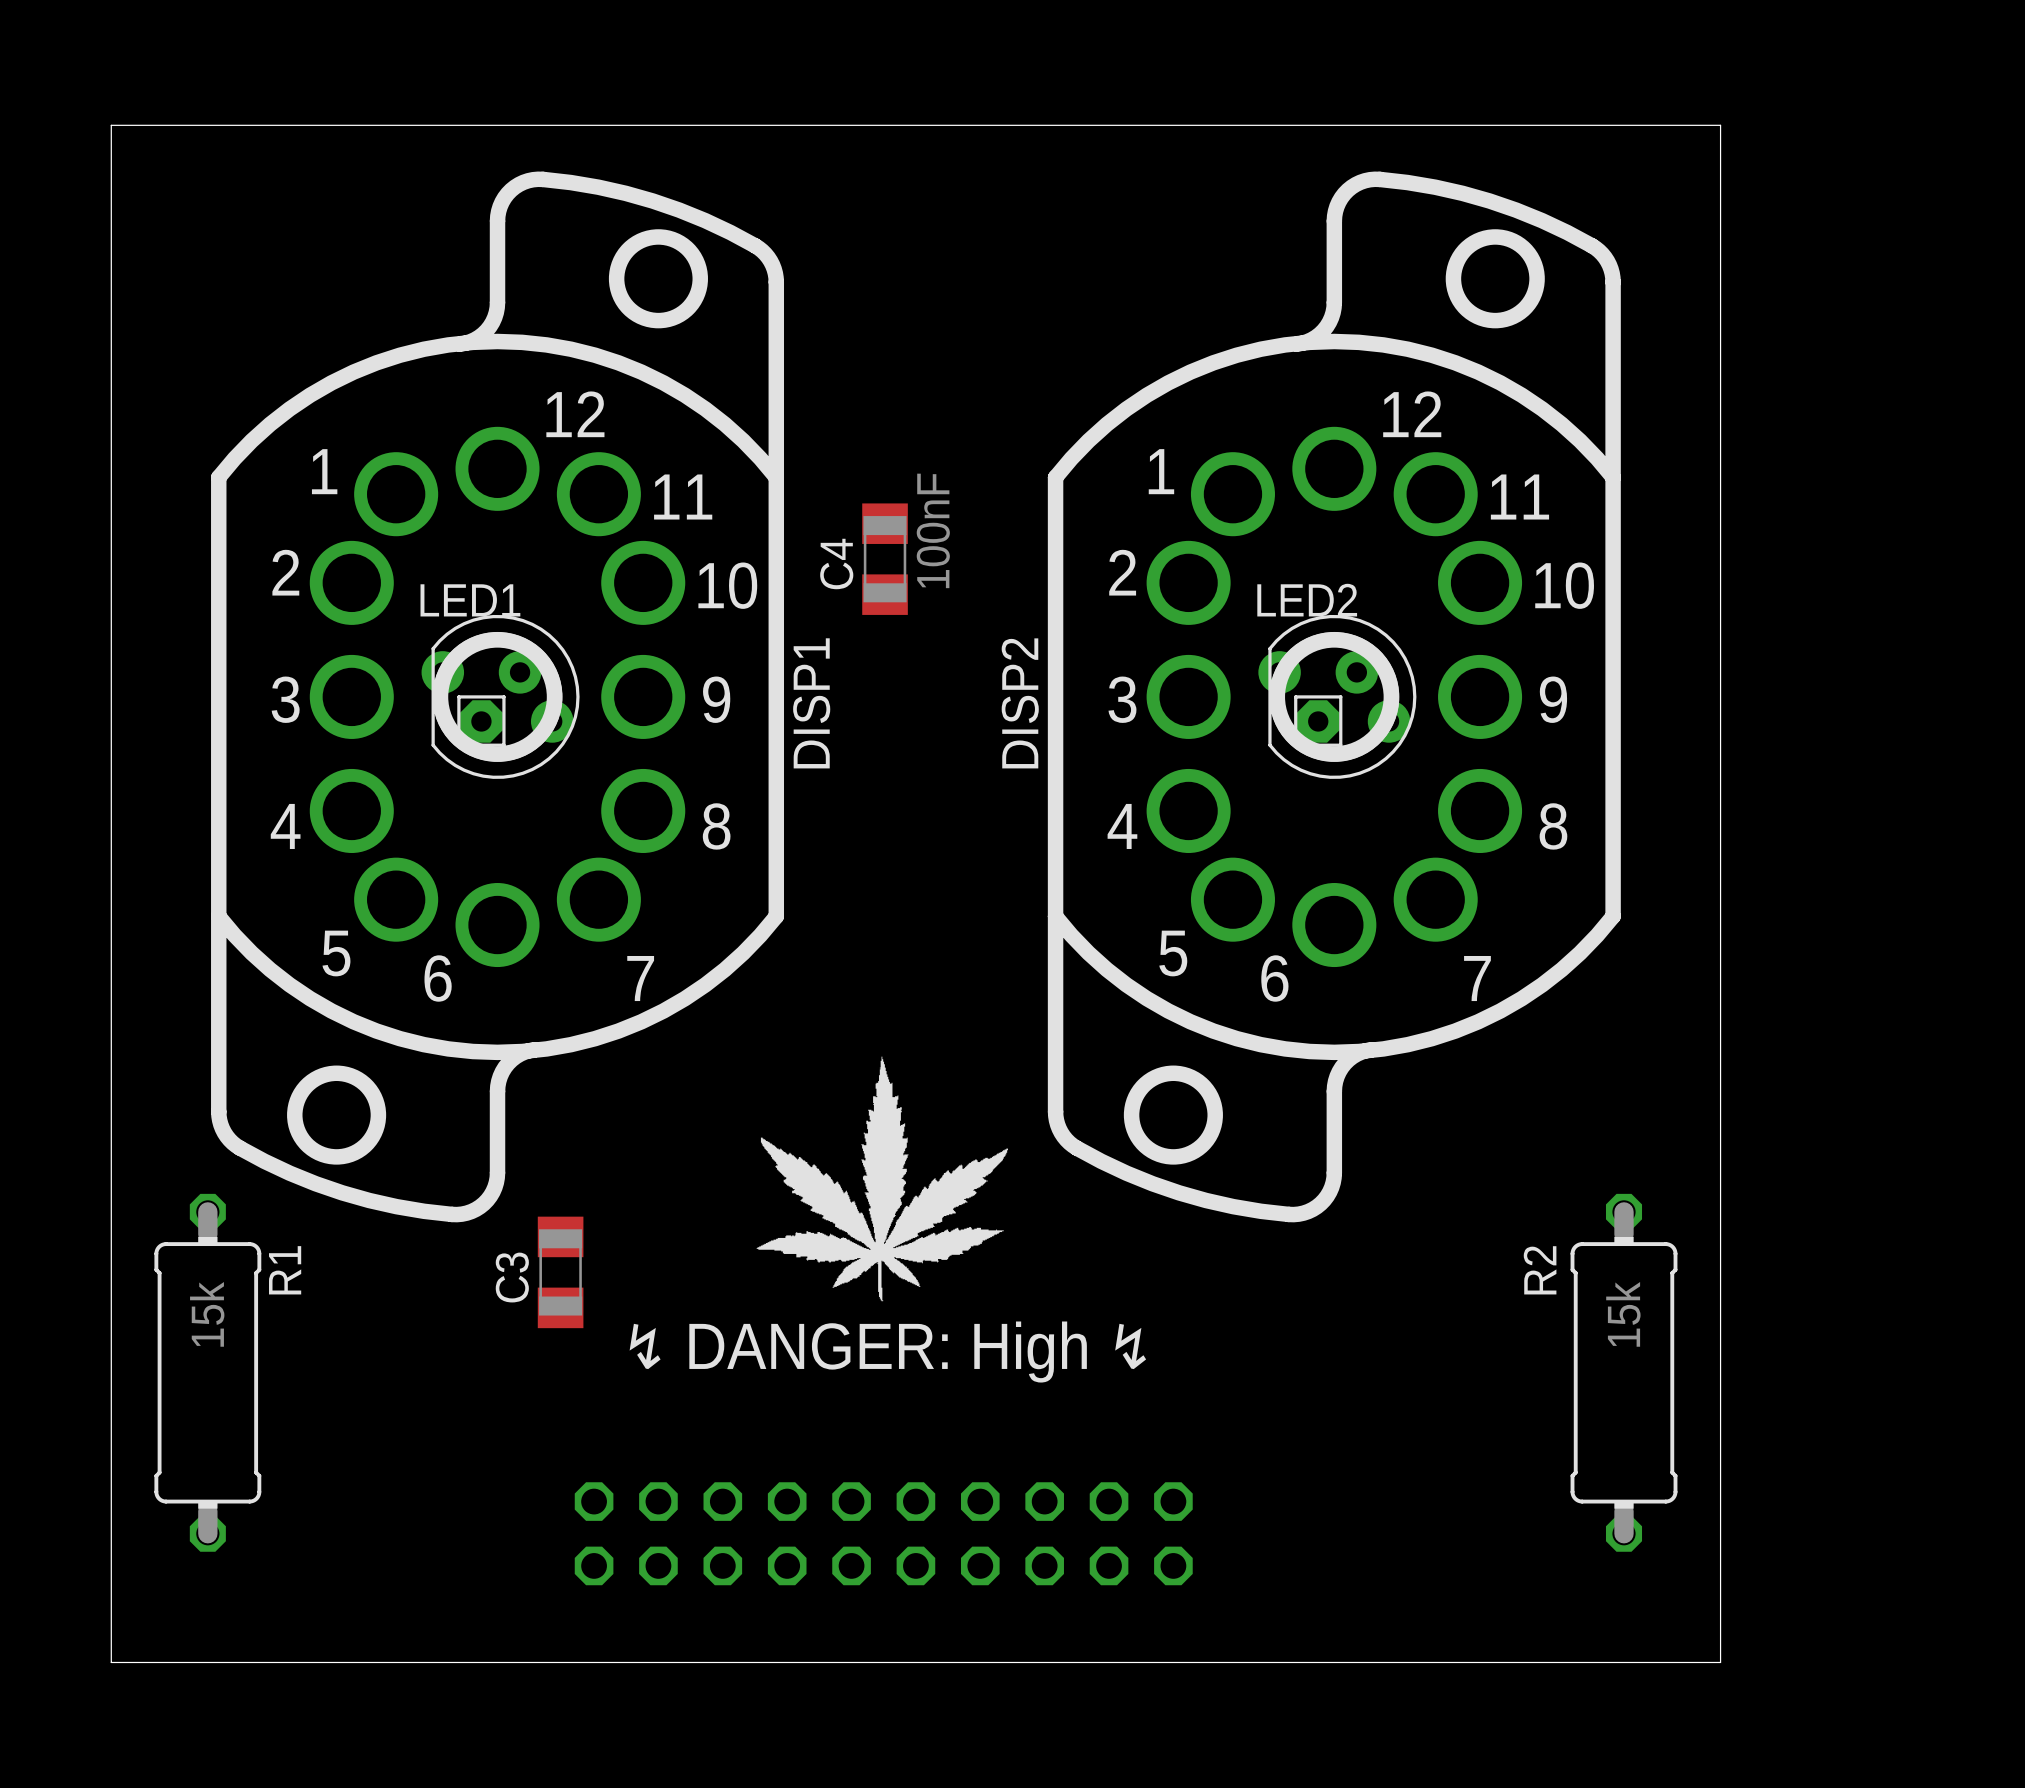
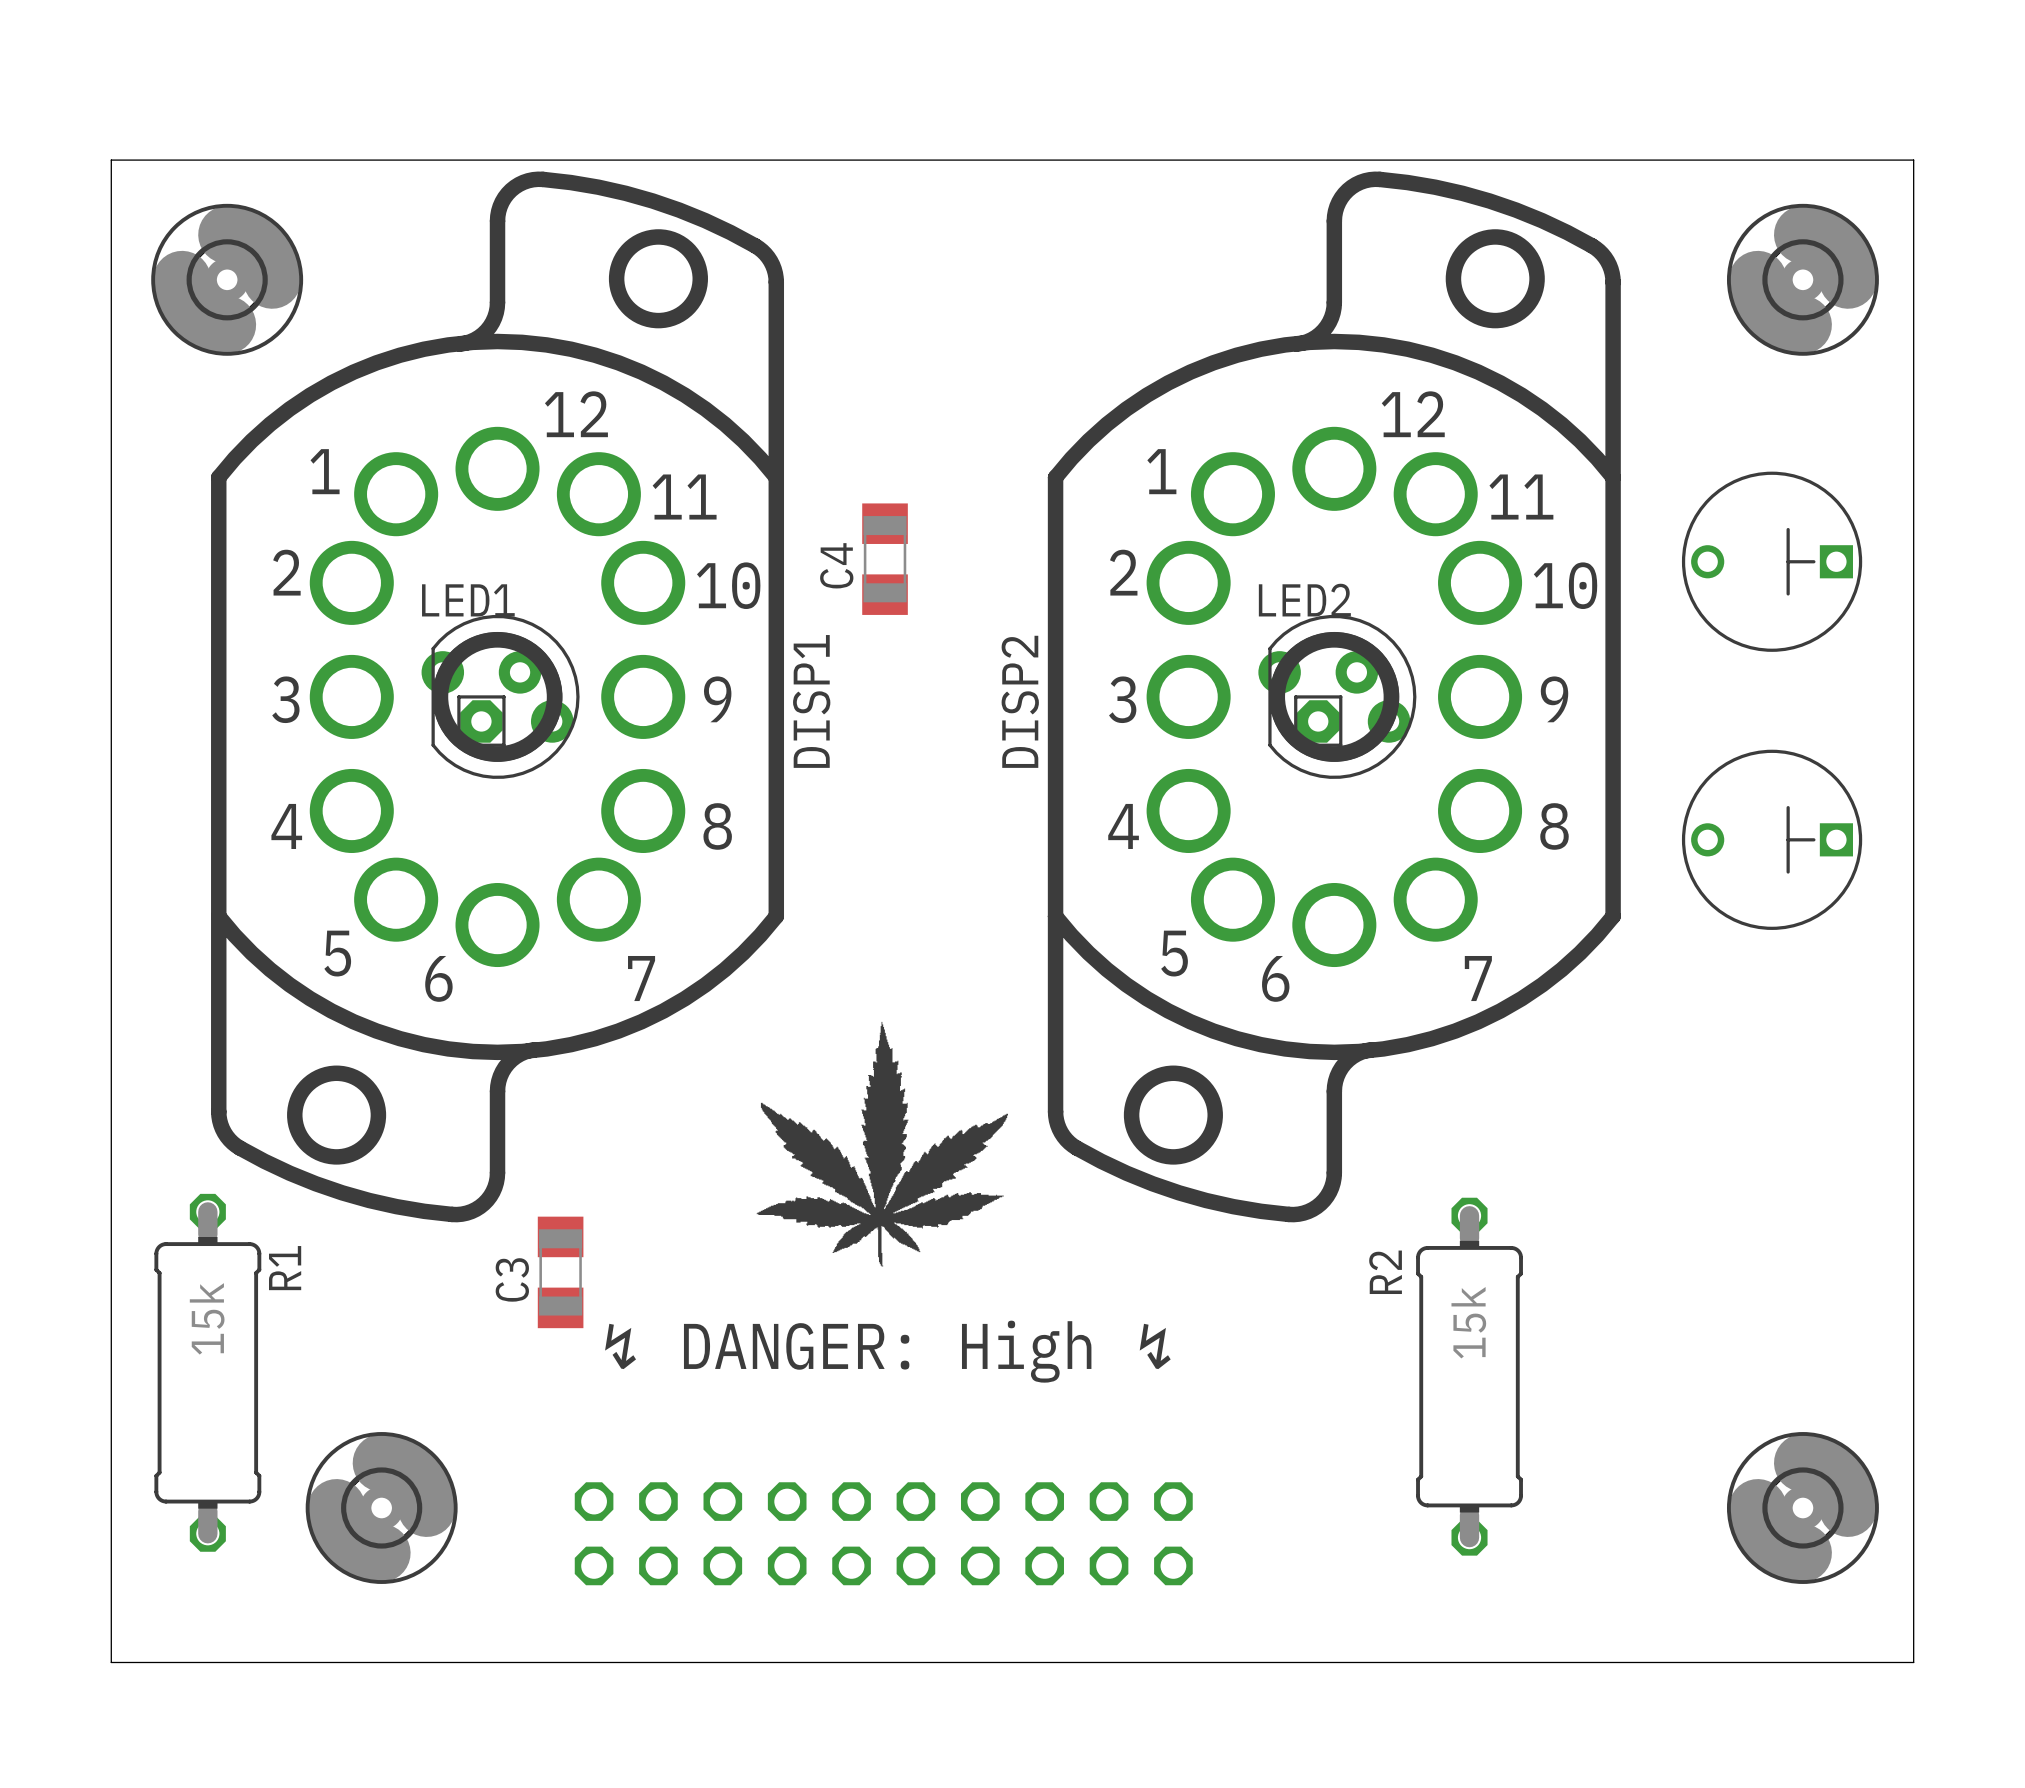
board edge: (111, 160) (111, 125) (1720, 125) (1720, 1662) -> (111, 160) (1913, 160) (1913, 1662) (1720, 1662)
part: none -> (227, 279)
part: none -> (1802, 279)
C4 value: 100nF (933, 530) -> none
part: none -> (1772, 561)
part: none -> (1772, 839)
drawing position: (882, 1178) -> (882, 1144)
R2 position: (1624, 1372) -> (1469, 1376)
part: none -> (381, 1508)
part: none -> (1802, 1508)

